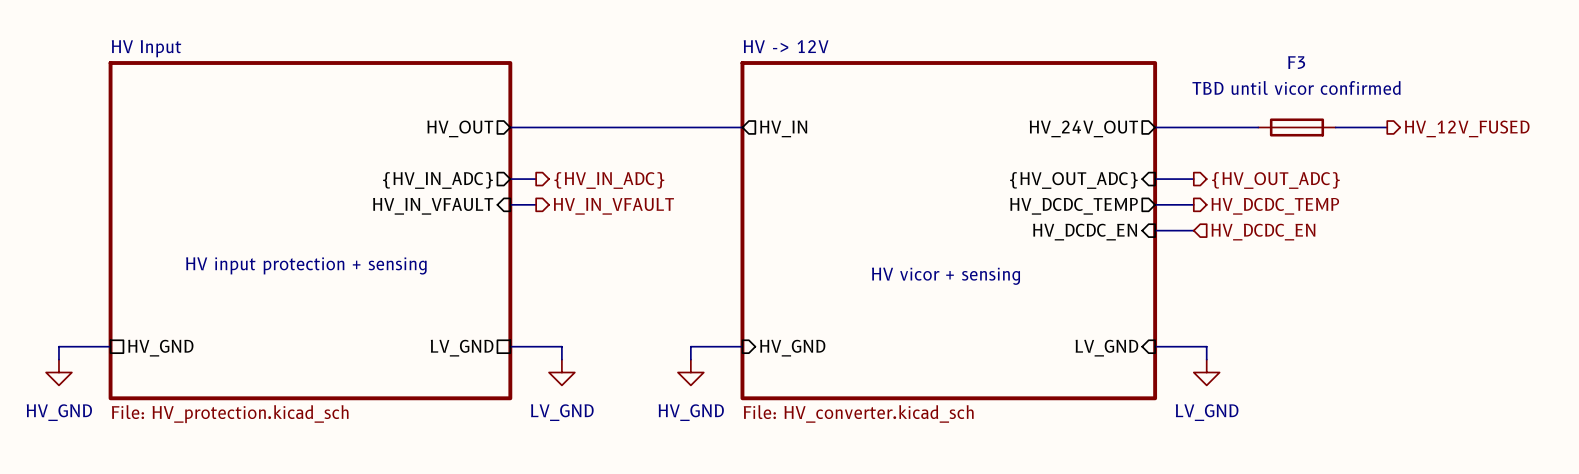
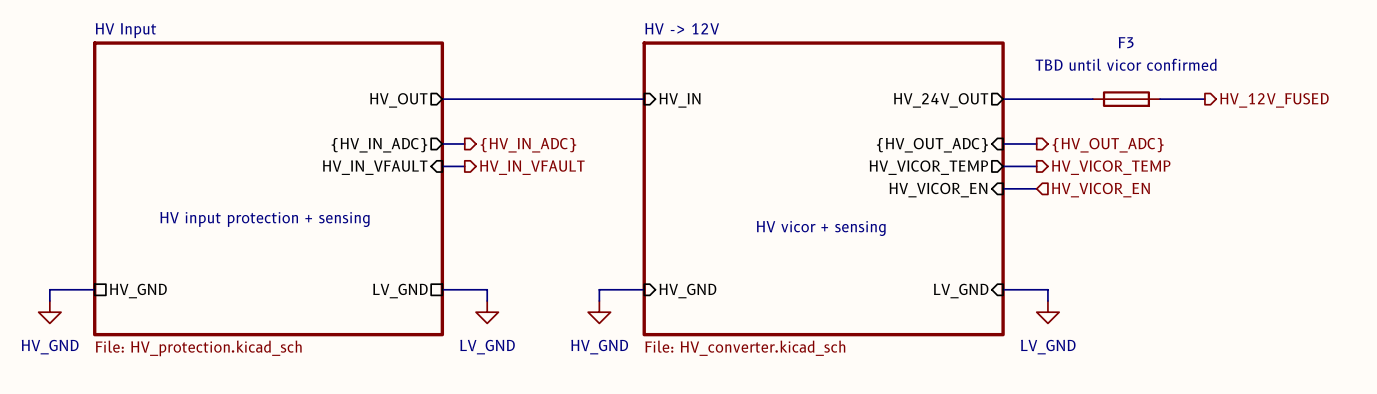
sheet pin shape: output (783, 128) -> input (680, 100)
sheet pin: HV_DCDC_TEMP (1074, 206) -> HV_VICOR_TEMP (928, 167)
hierarchical label: HV_DCDC_TEMP (1275, 206) -> HV_VICOR_TEMP (1111, 167)
sheet pin: HV_DCDC_EN (1085, 232) -> HV_VICOR_EN (938, 190)
hierarchical label: HV_DCDC_EN (1263, 232) -> HV_VICOR_EN (1100, 190)

